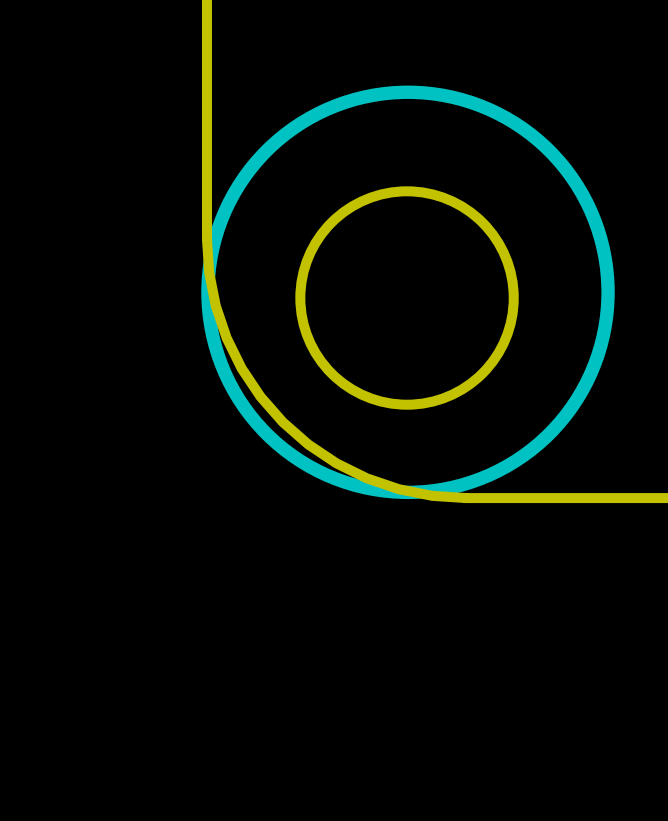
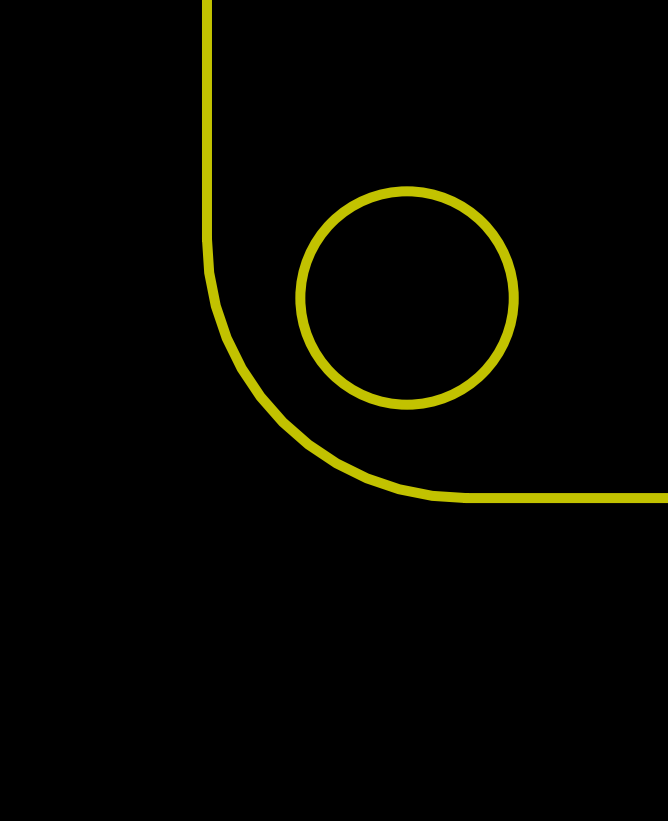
drawing: [201, 85, 615, 500] -> none

